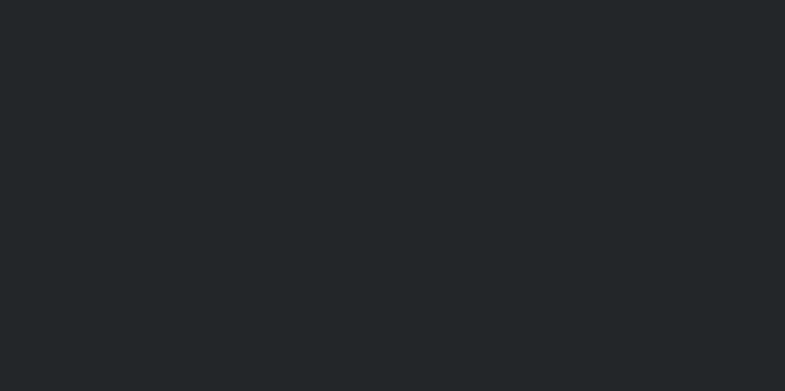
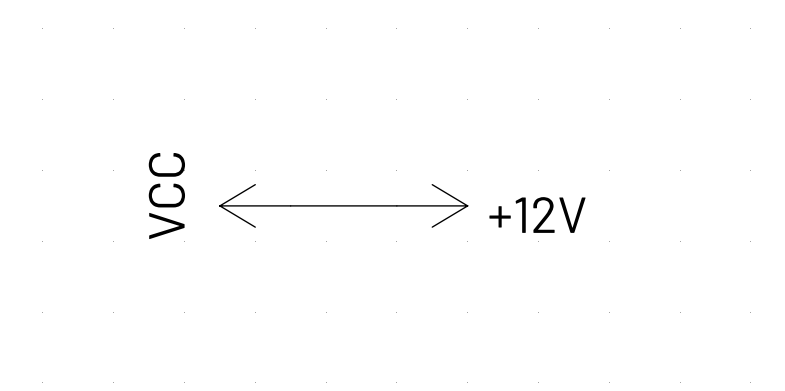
power symbol: none -> VCC (255, 205)
wire: none -> (290, 205) (396, 205)
power symbol: none -> +12V (432, 205)

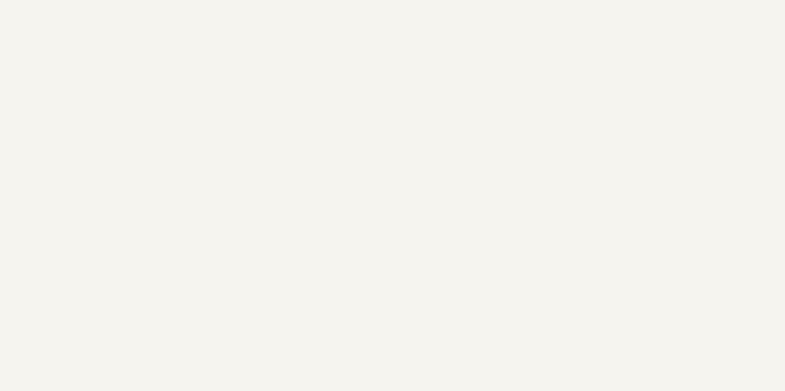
power symbol: VCC (255, 205) -> none
wire: (290, 205) (396, 205) -> none
power symbol: +12V (432, 205) -> none

